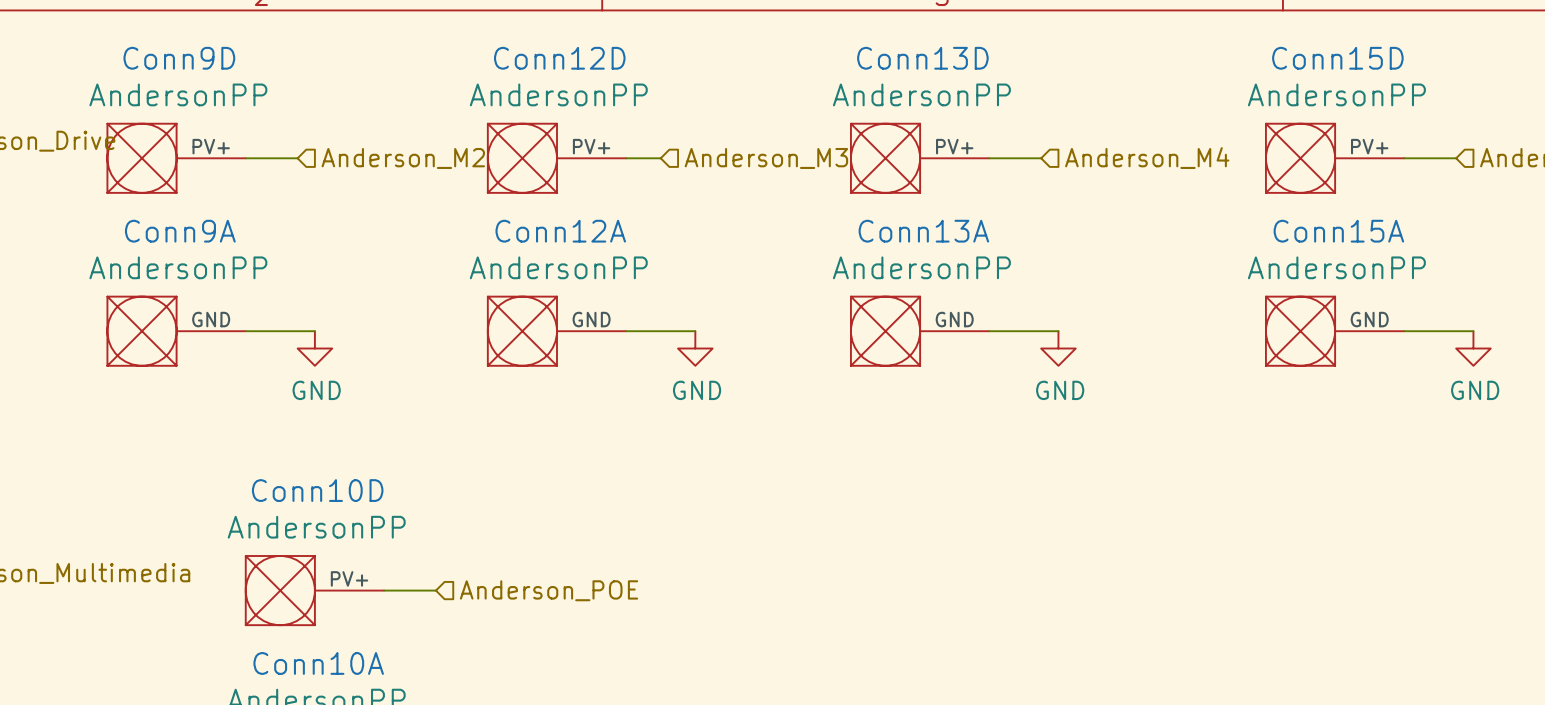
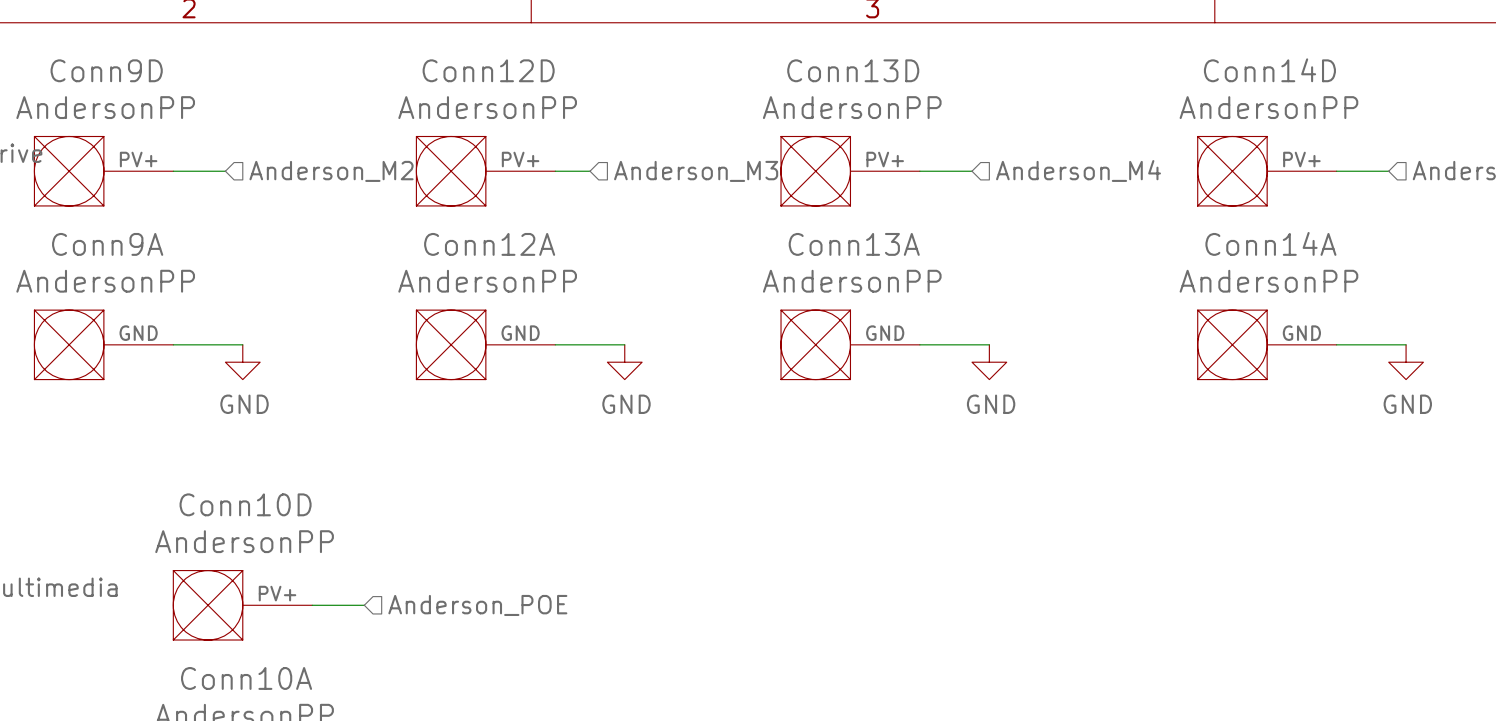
Conn15D name: Conn15D (1337, 58) -> Conn14D (1269, 70)
Conn15A name: Conn15A (1338, 231) -> Conn14A (1270, 243)

